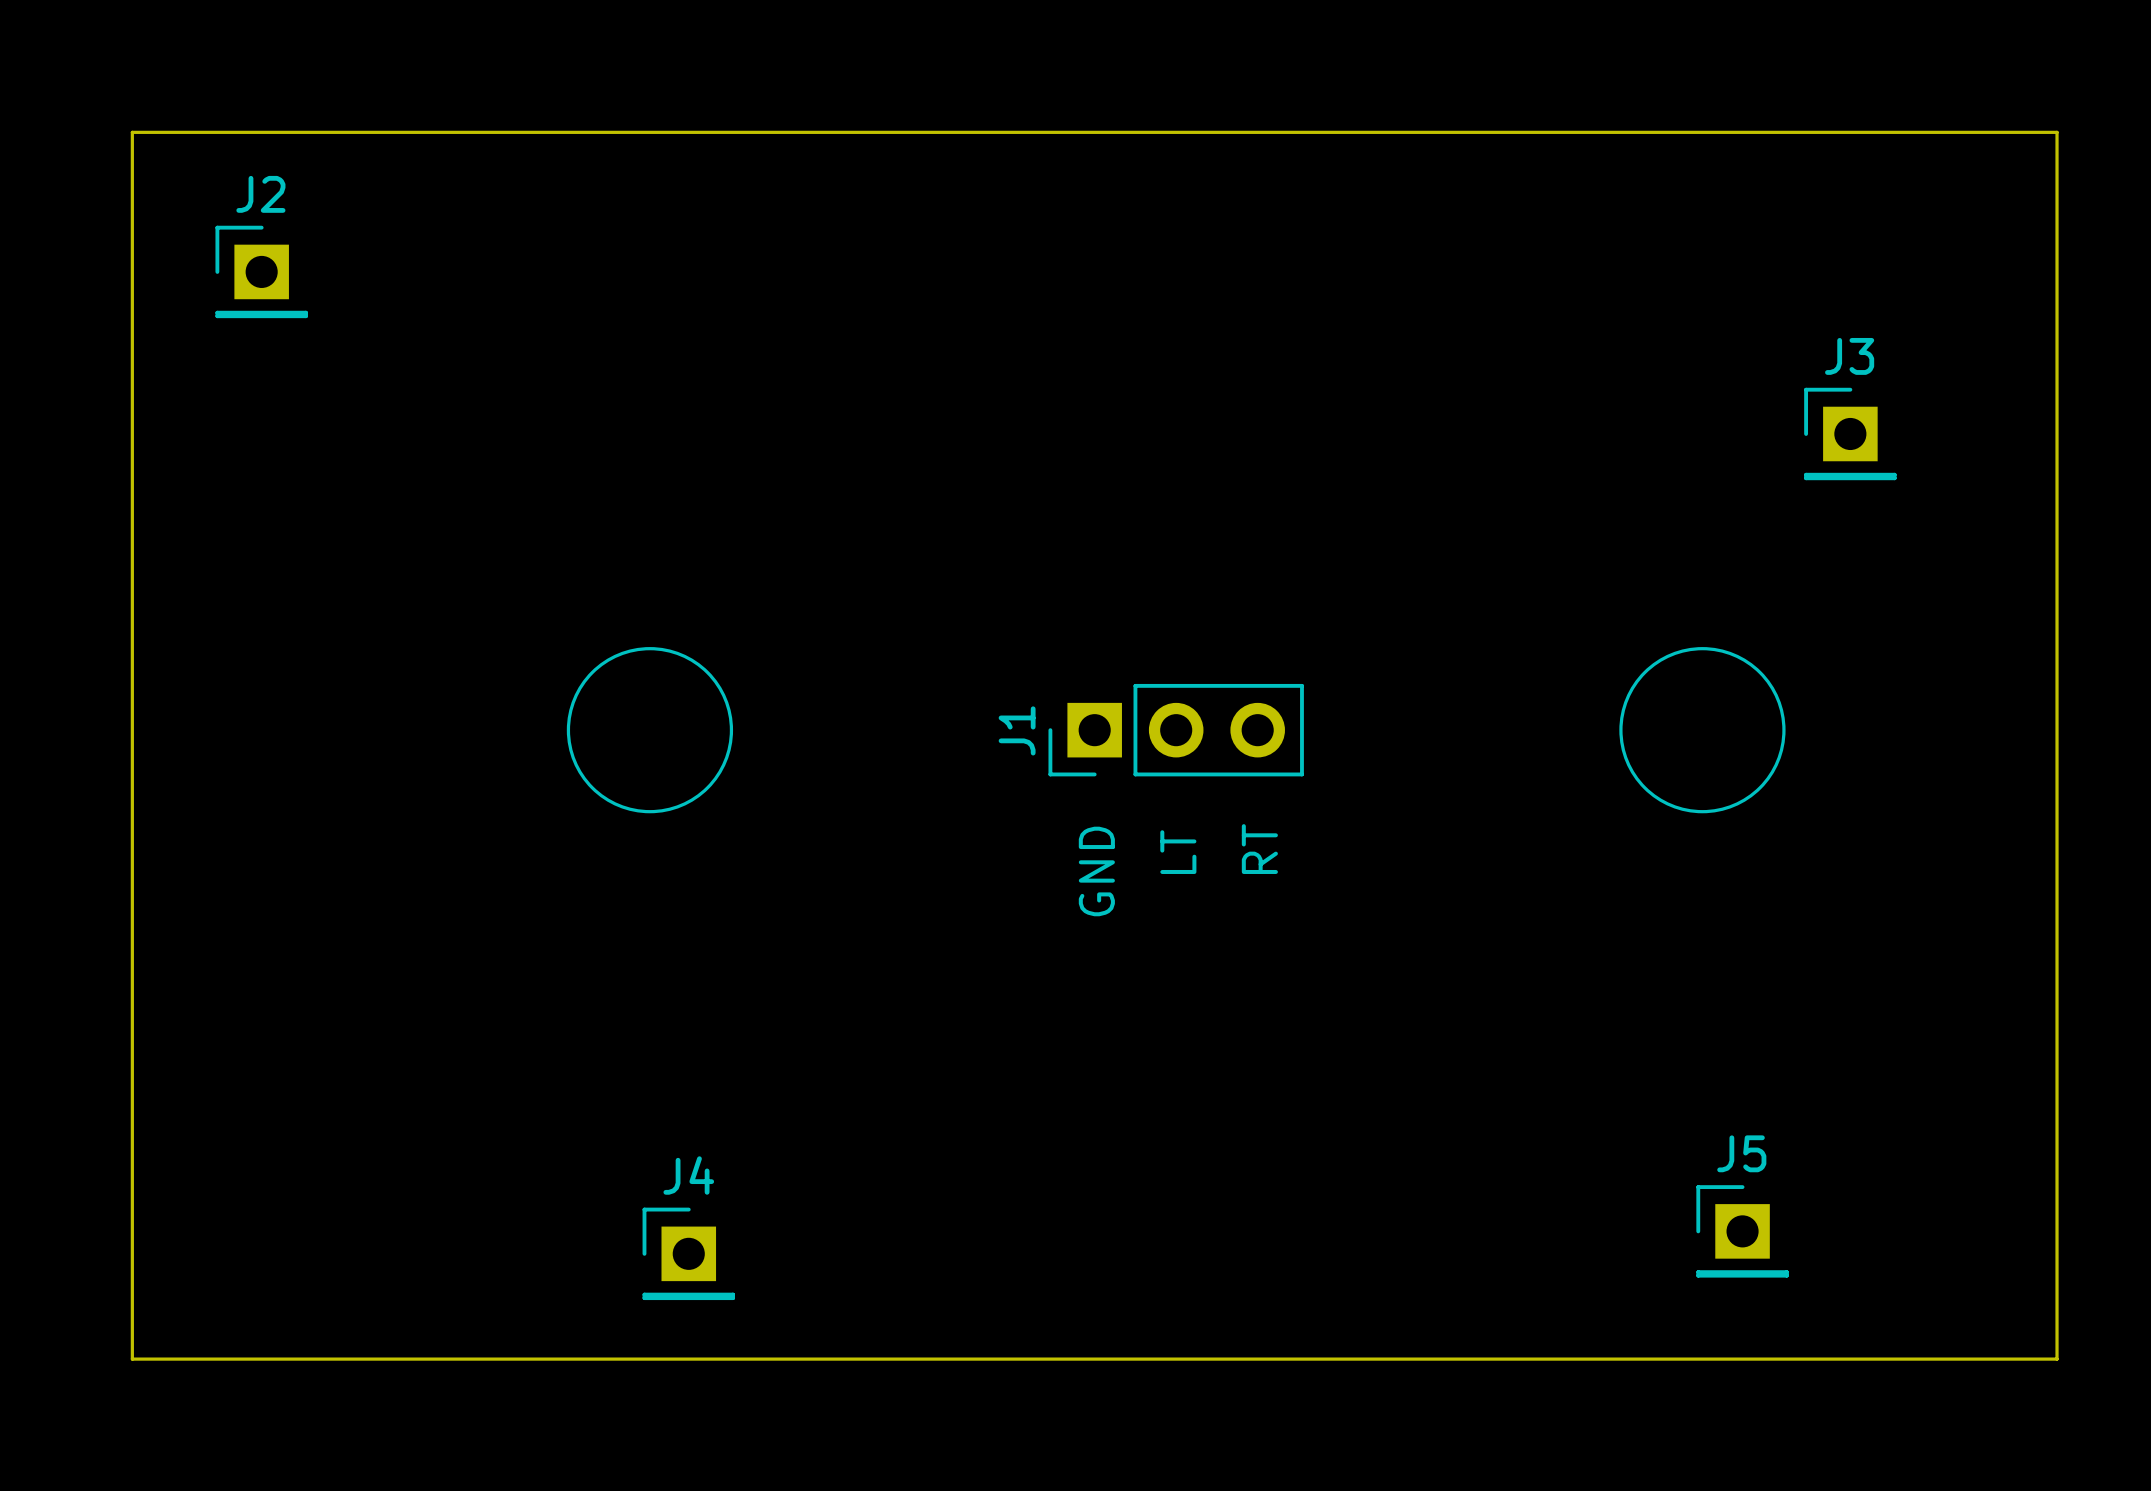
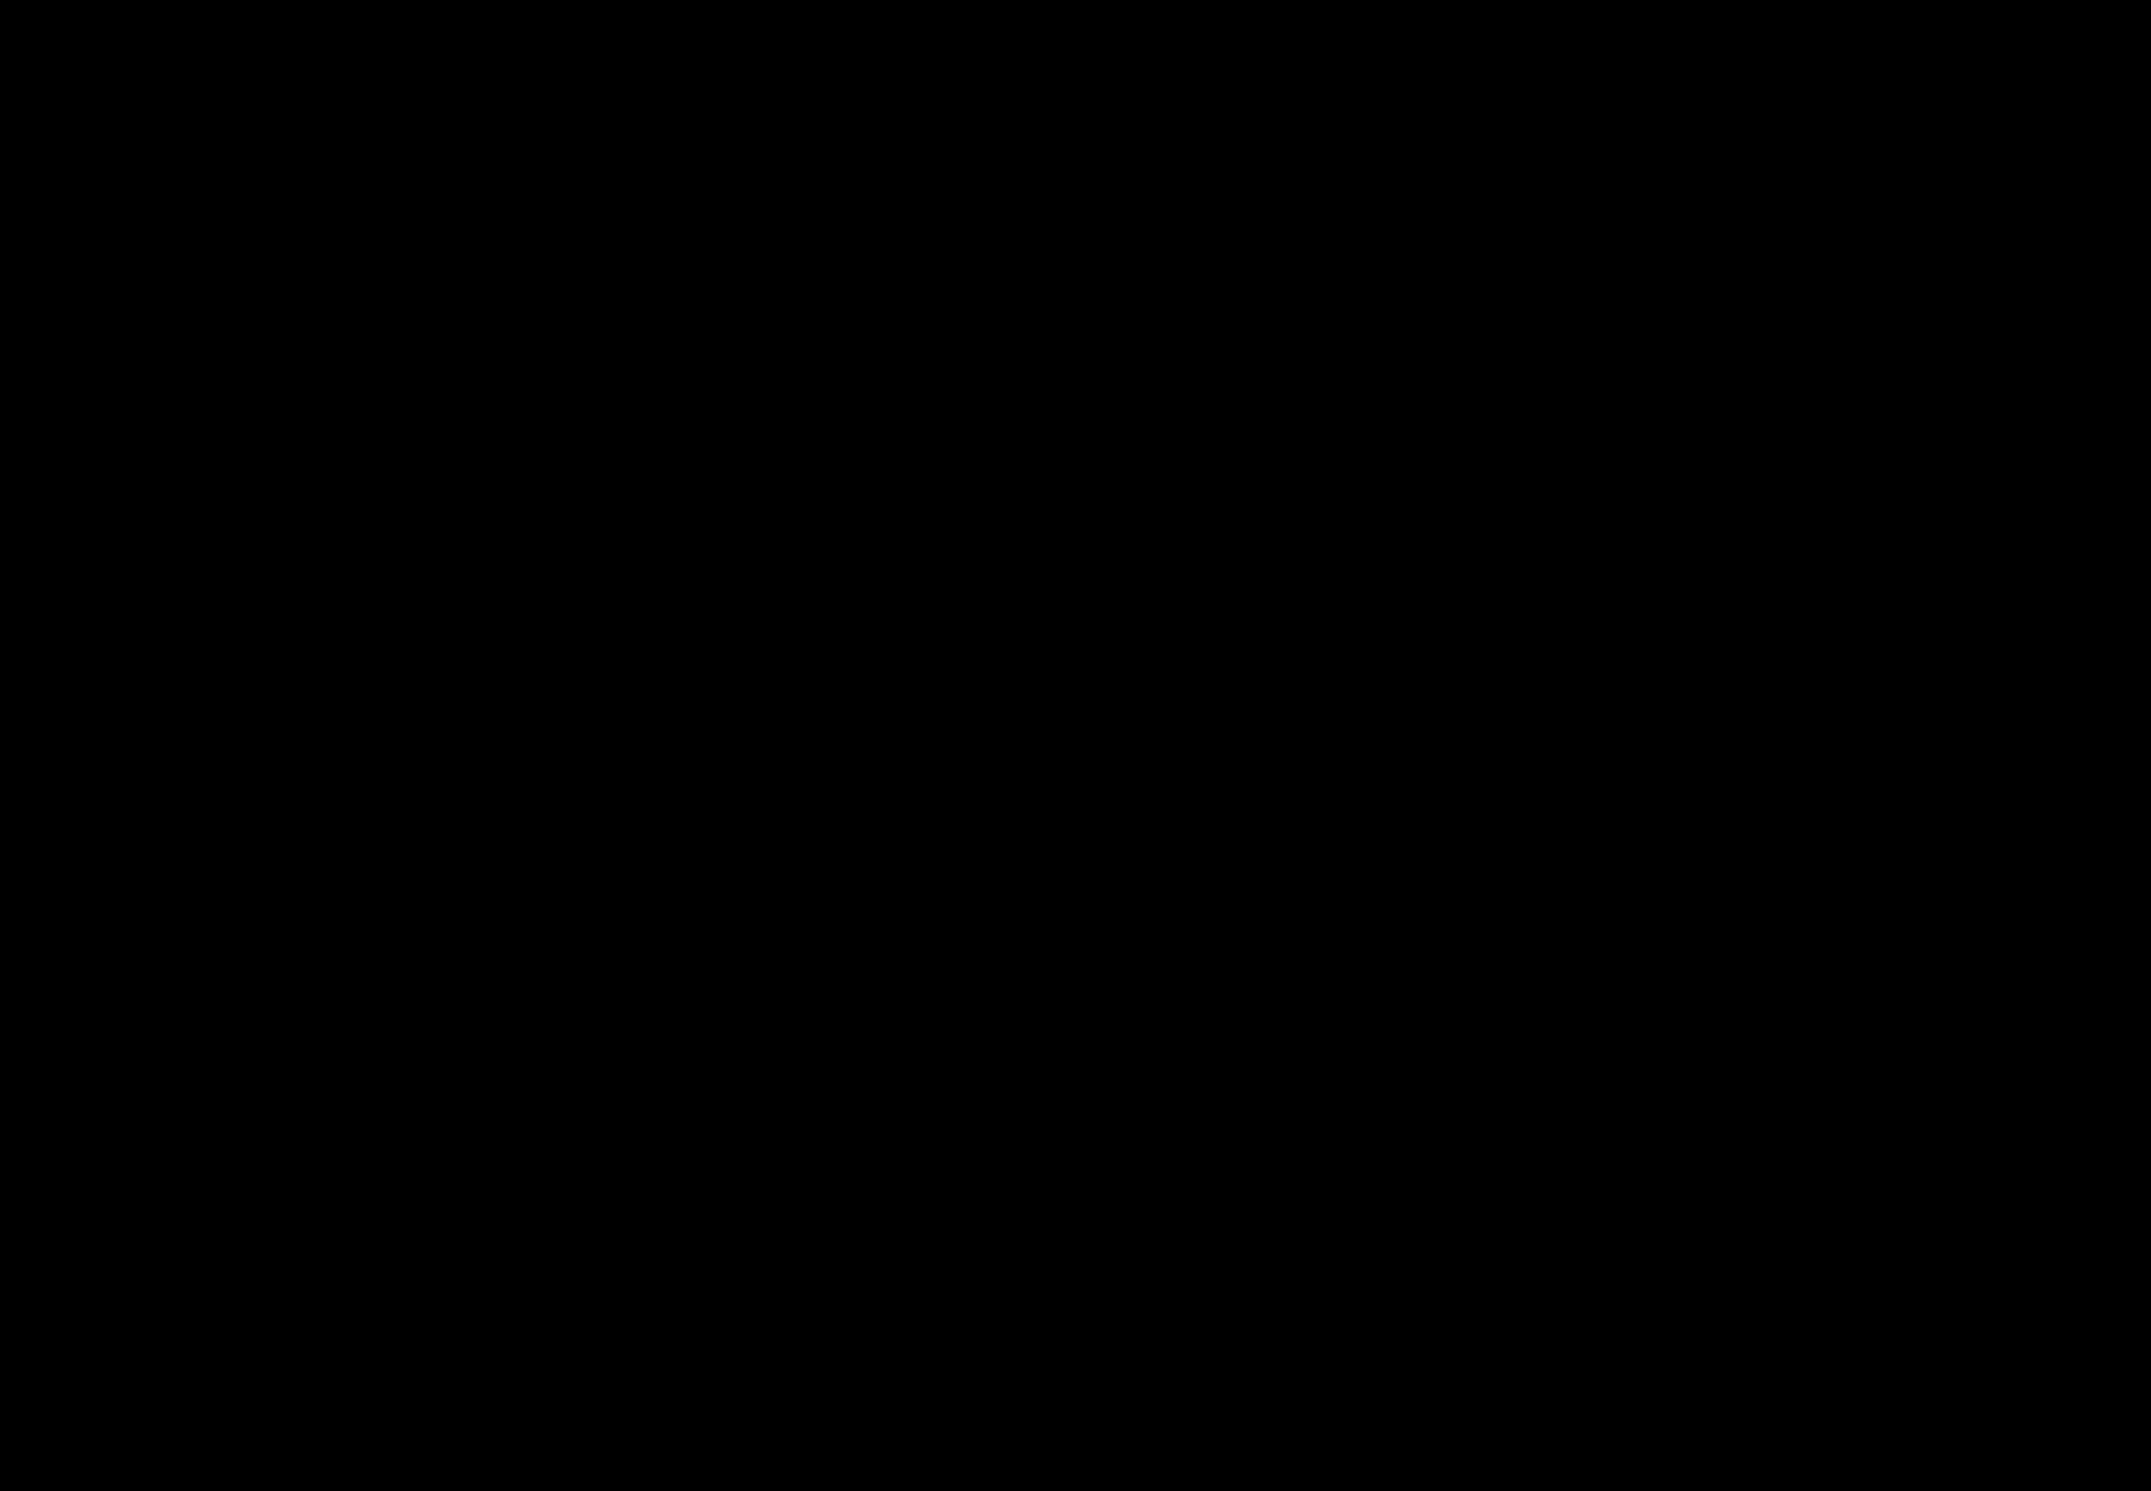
board edge: (132, 132) (2057, 132) (2057, 1359) (132, 1359) (132, 132) -> none
J2: (261, 271) -> none
J3: (1850, 433) -> none
drawing: [566, 647, 734, 814] -> none
drawing: [1619, 647, 1786, 814] -> none
J1: (1176, 730) -> none
text: RT (1259, 849) -> none
text: LT (1178, 852) -> none
text: GND (1096, 871) -> none
J5: (1742, 1231) -> none
J4: (688, 1253) -> none

